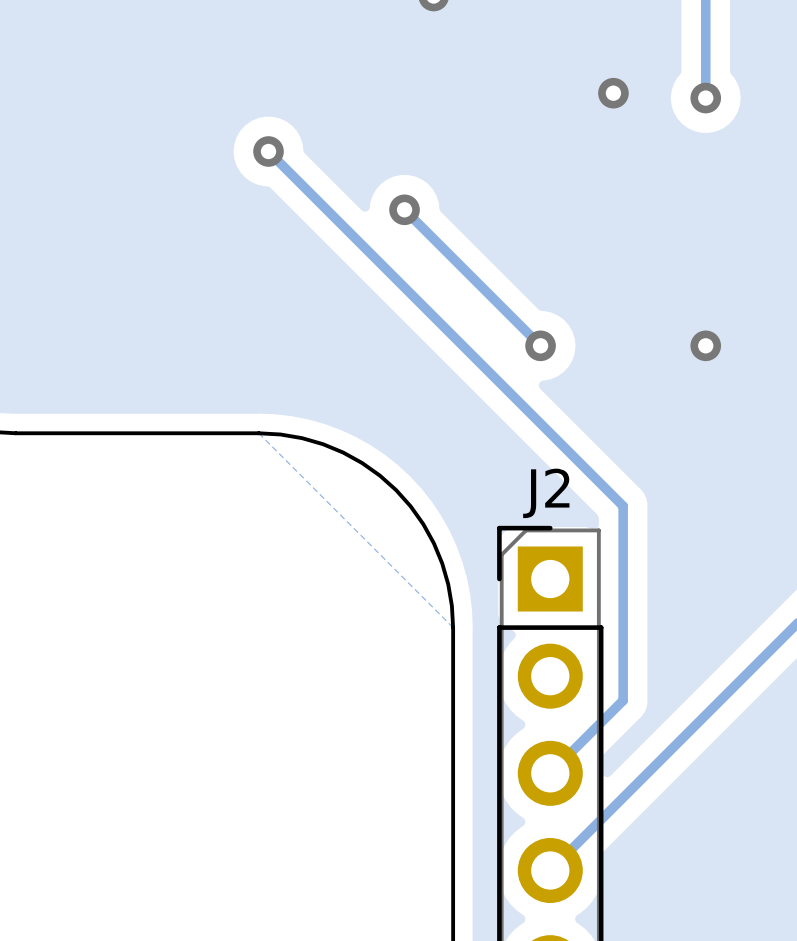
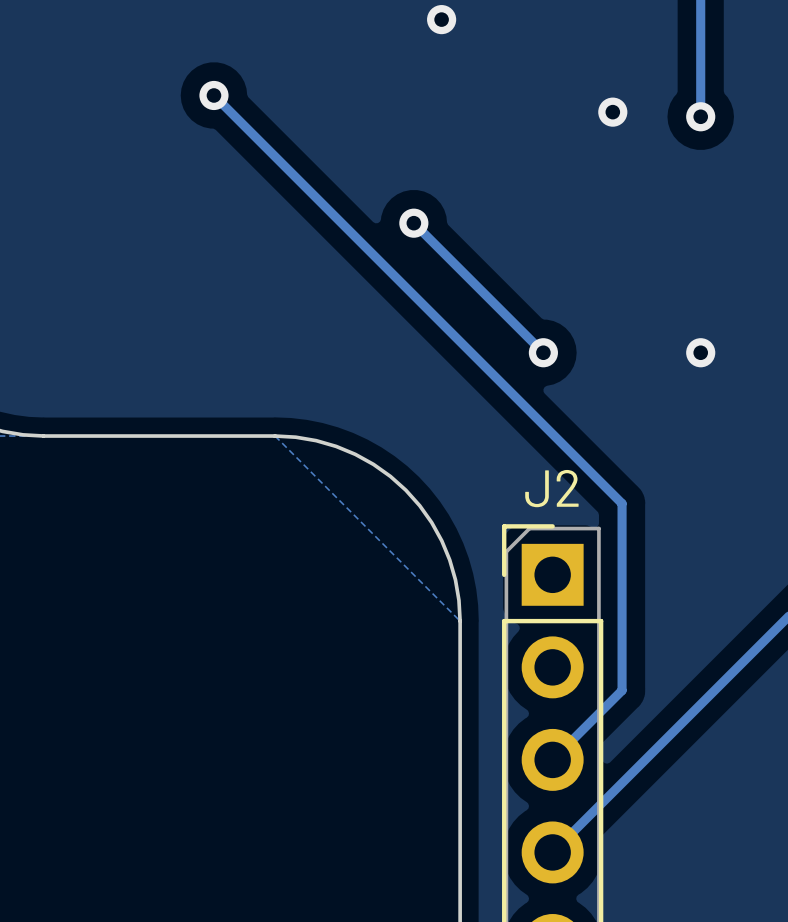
via: none -> (213, 95)
track: (268, 151) (623, 506) -> (213, 95) (622, 505)
via: (268, 151) -> none

